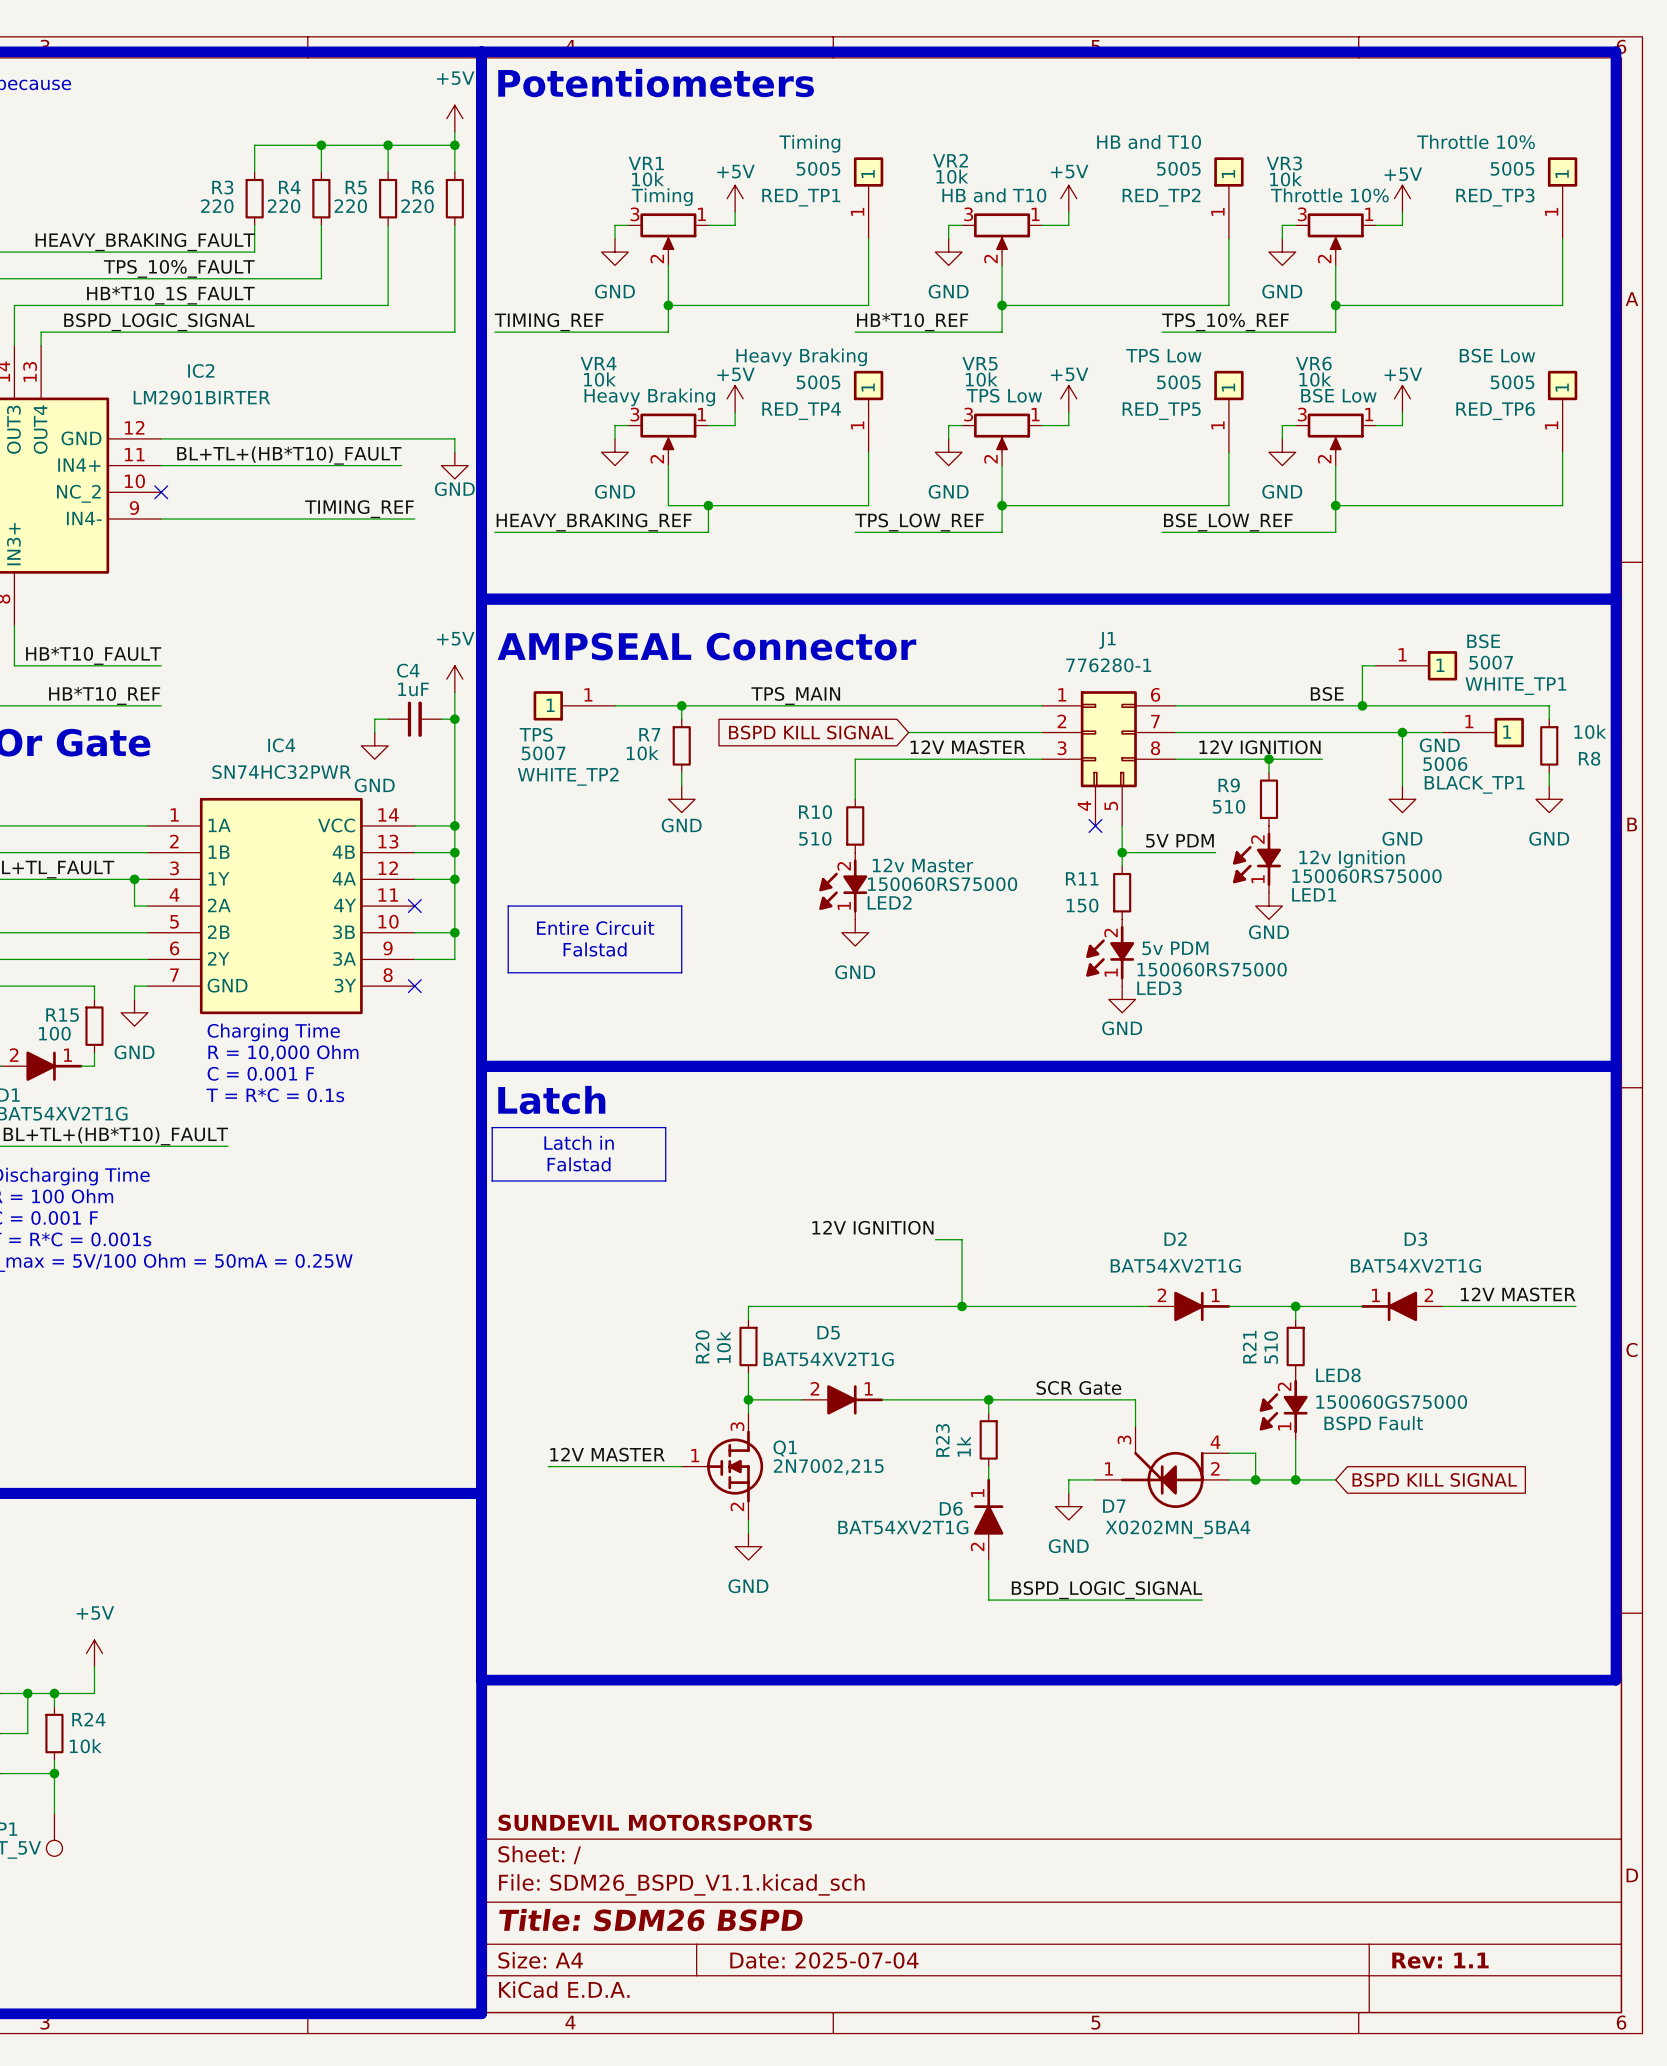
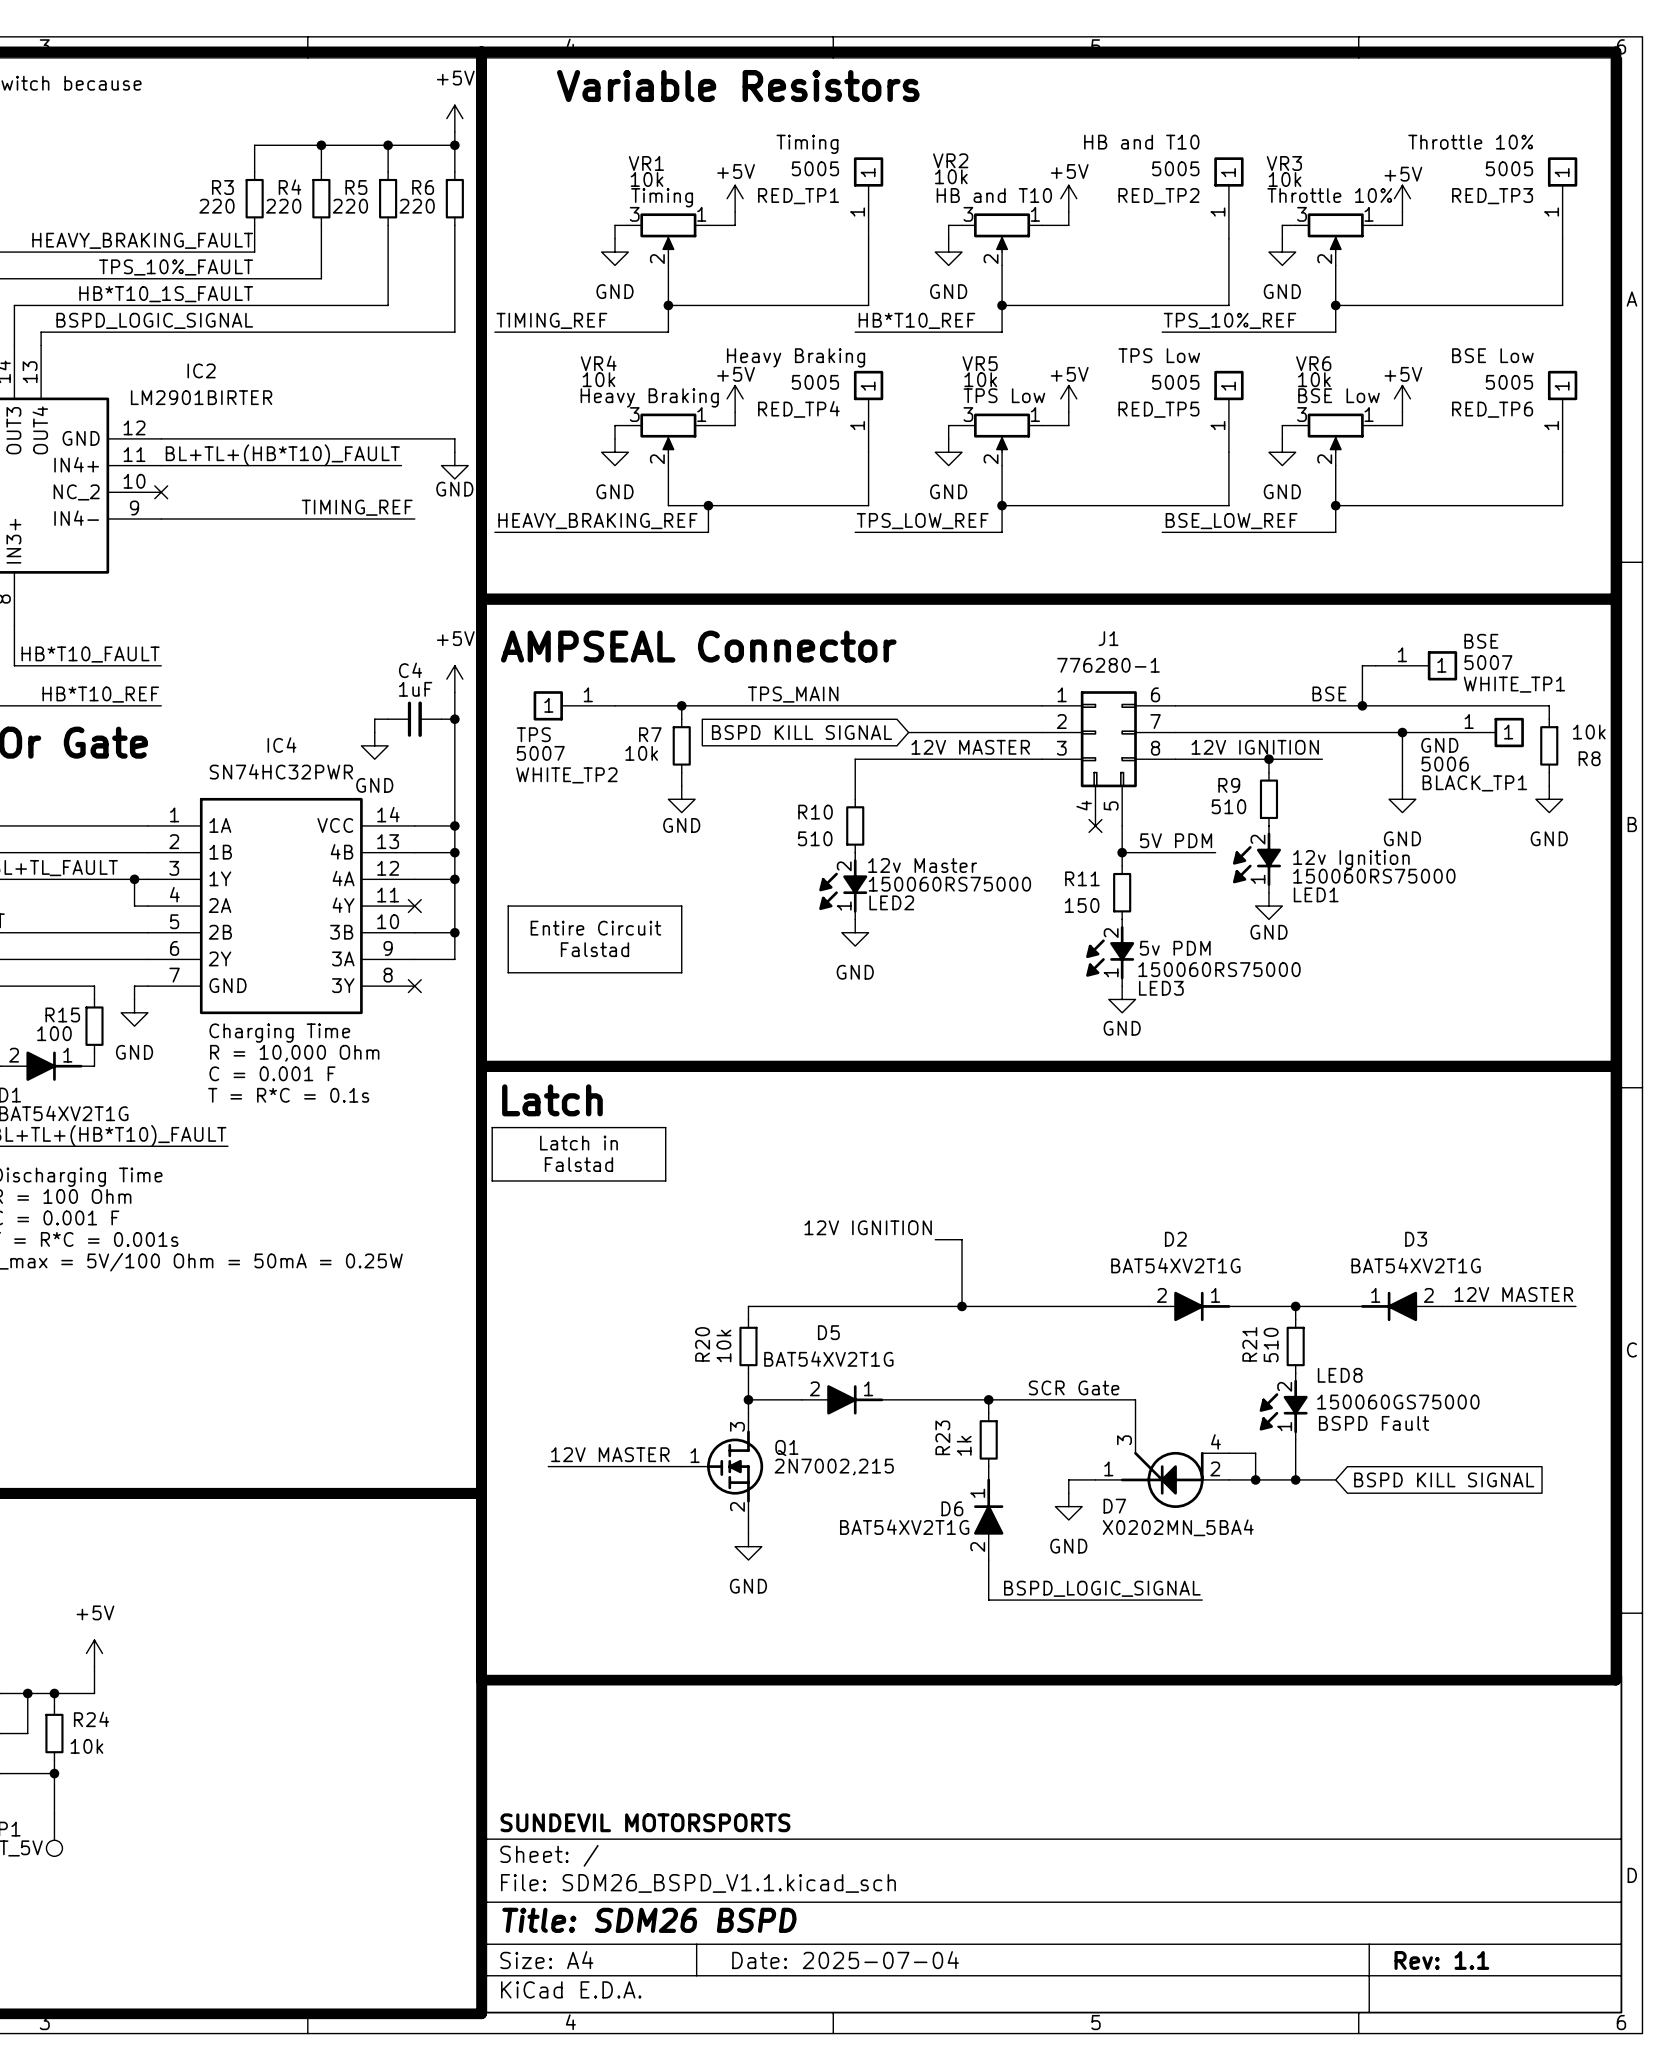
text: Potentiometers (656, 83) -> none
text: none -> Variable Resistors (738, 86)

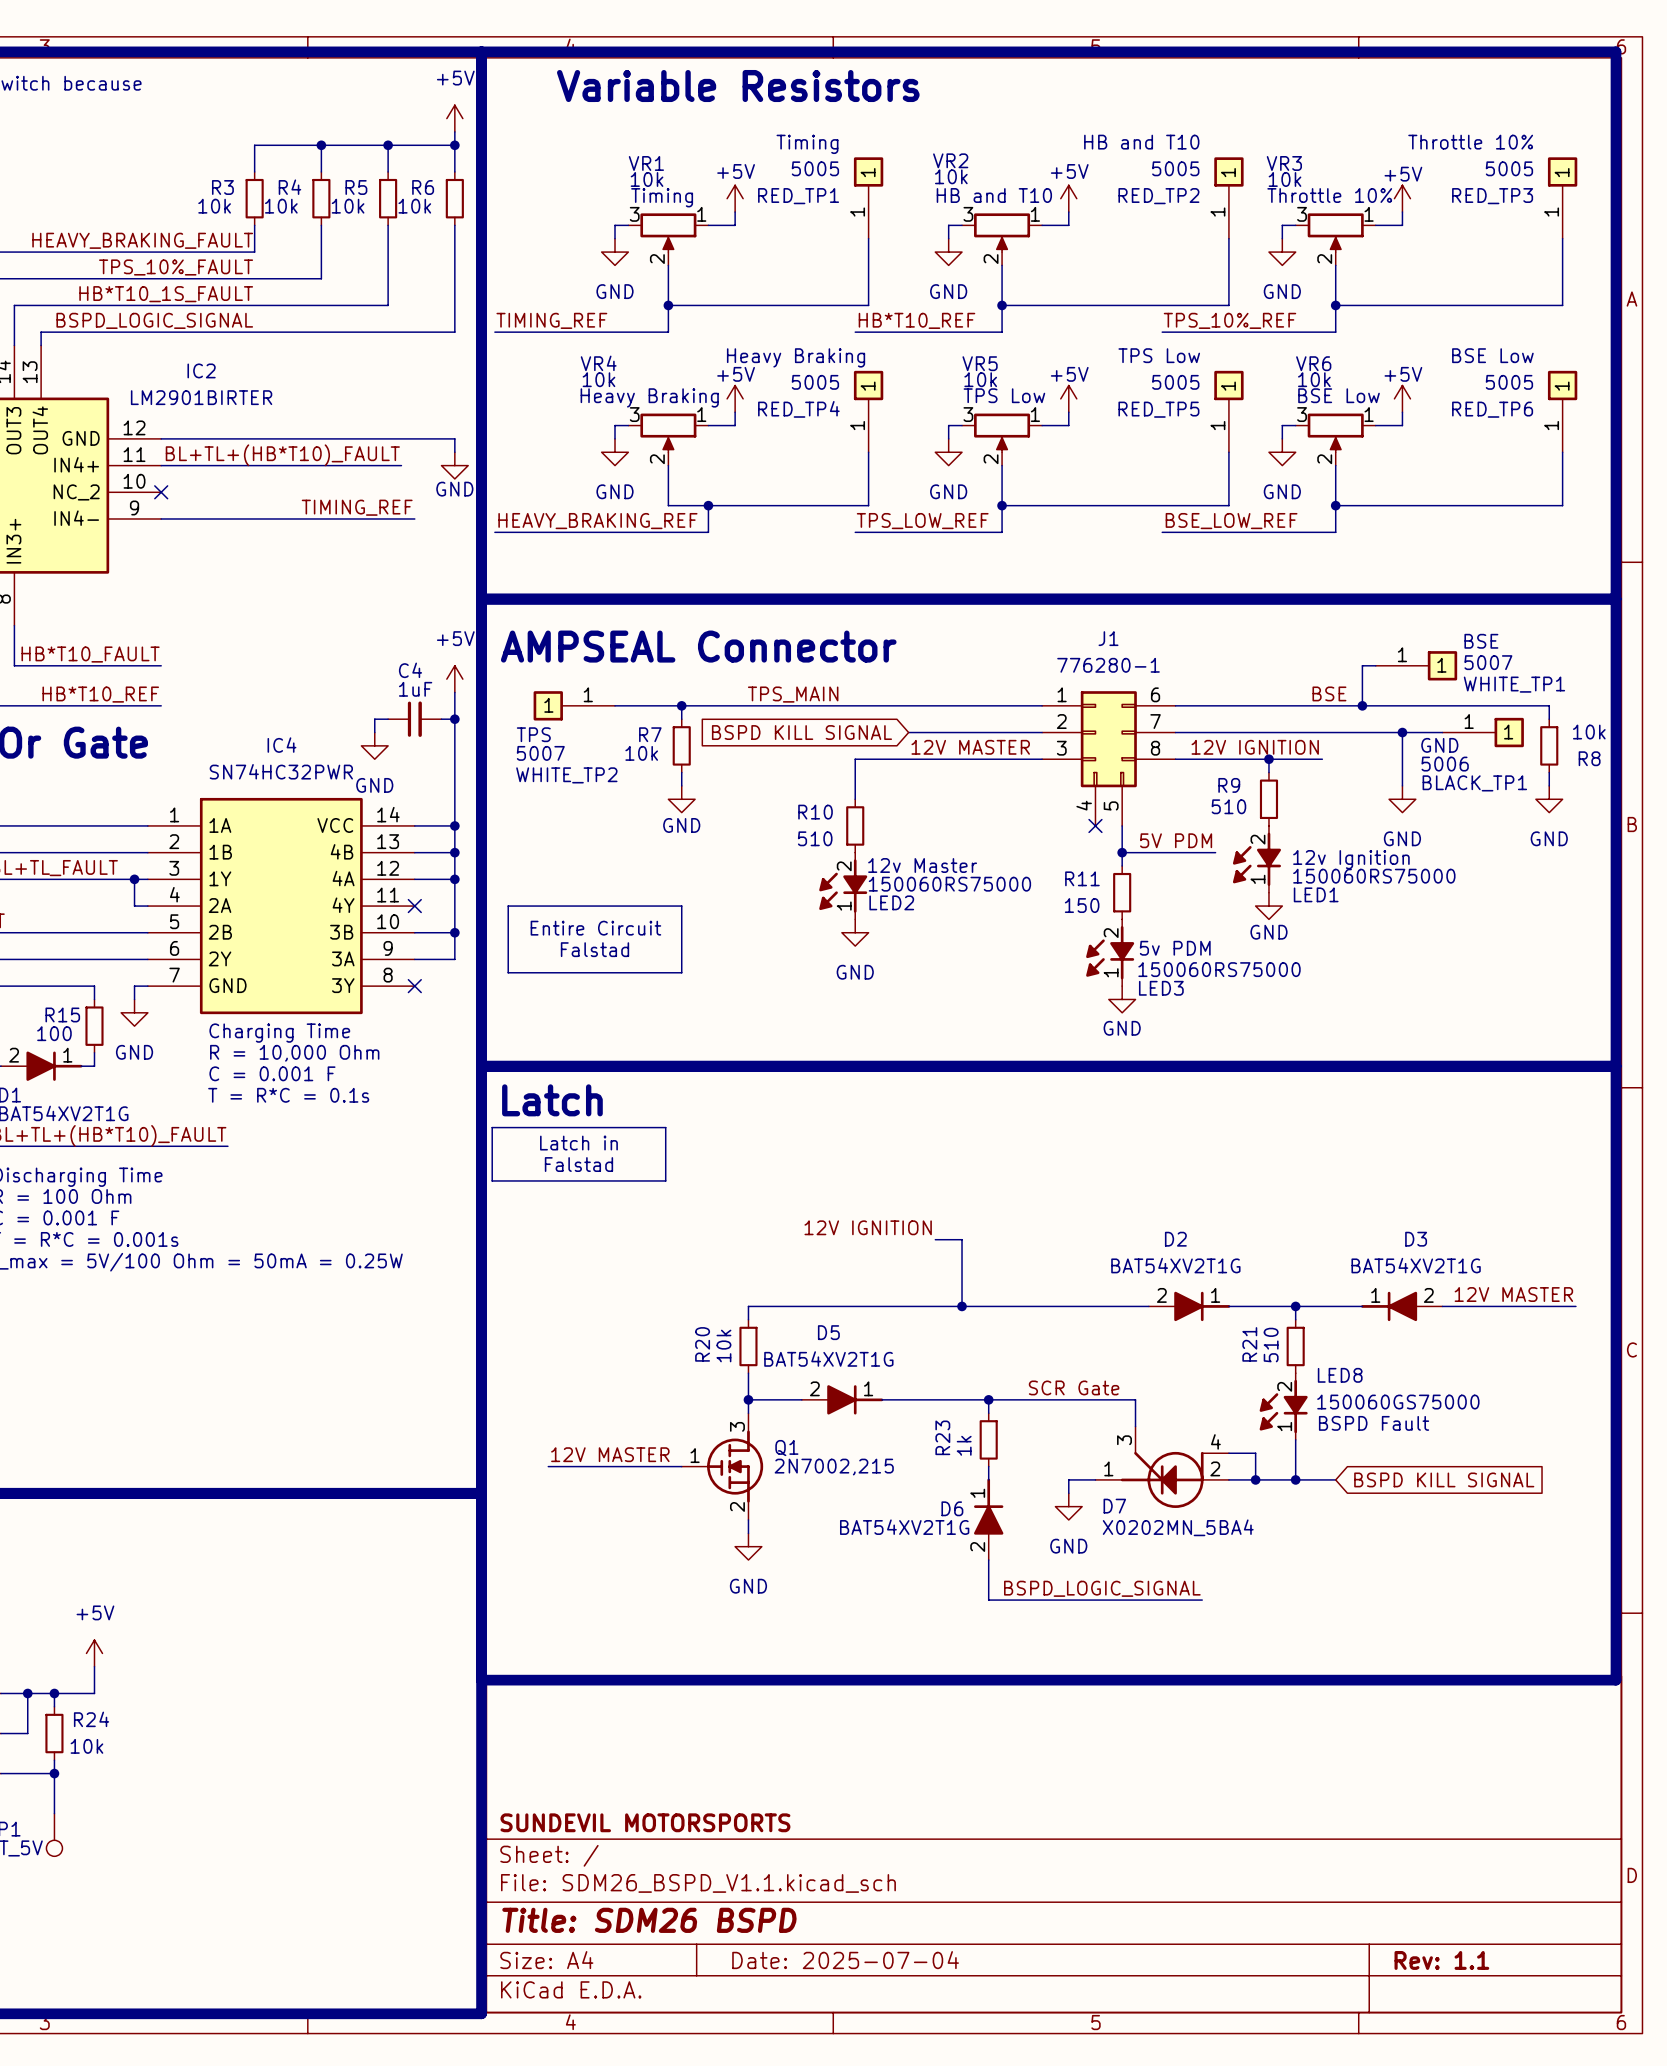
R3 value: 220 (216, 206) -> 10k (214, 206)
R4 value: 220 (283, 206) -> 10k (281, 206)
R5 value: 220 (350, 206) -> 10k (348, 206)
R6 value: 220 (417, 206) -> 10k (414, 206)

